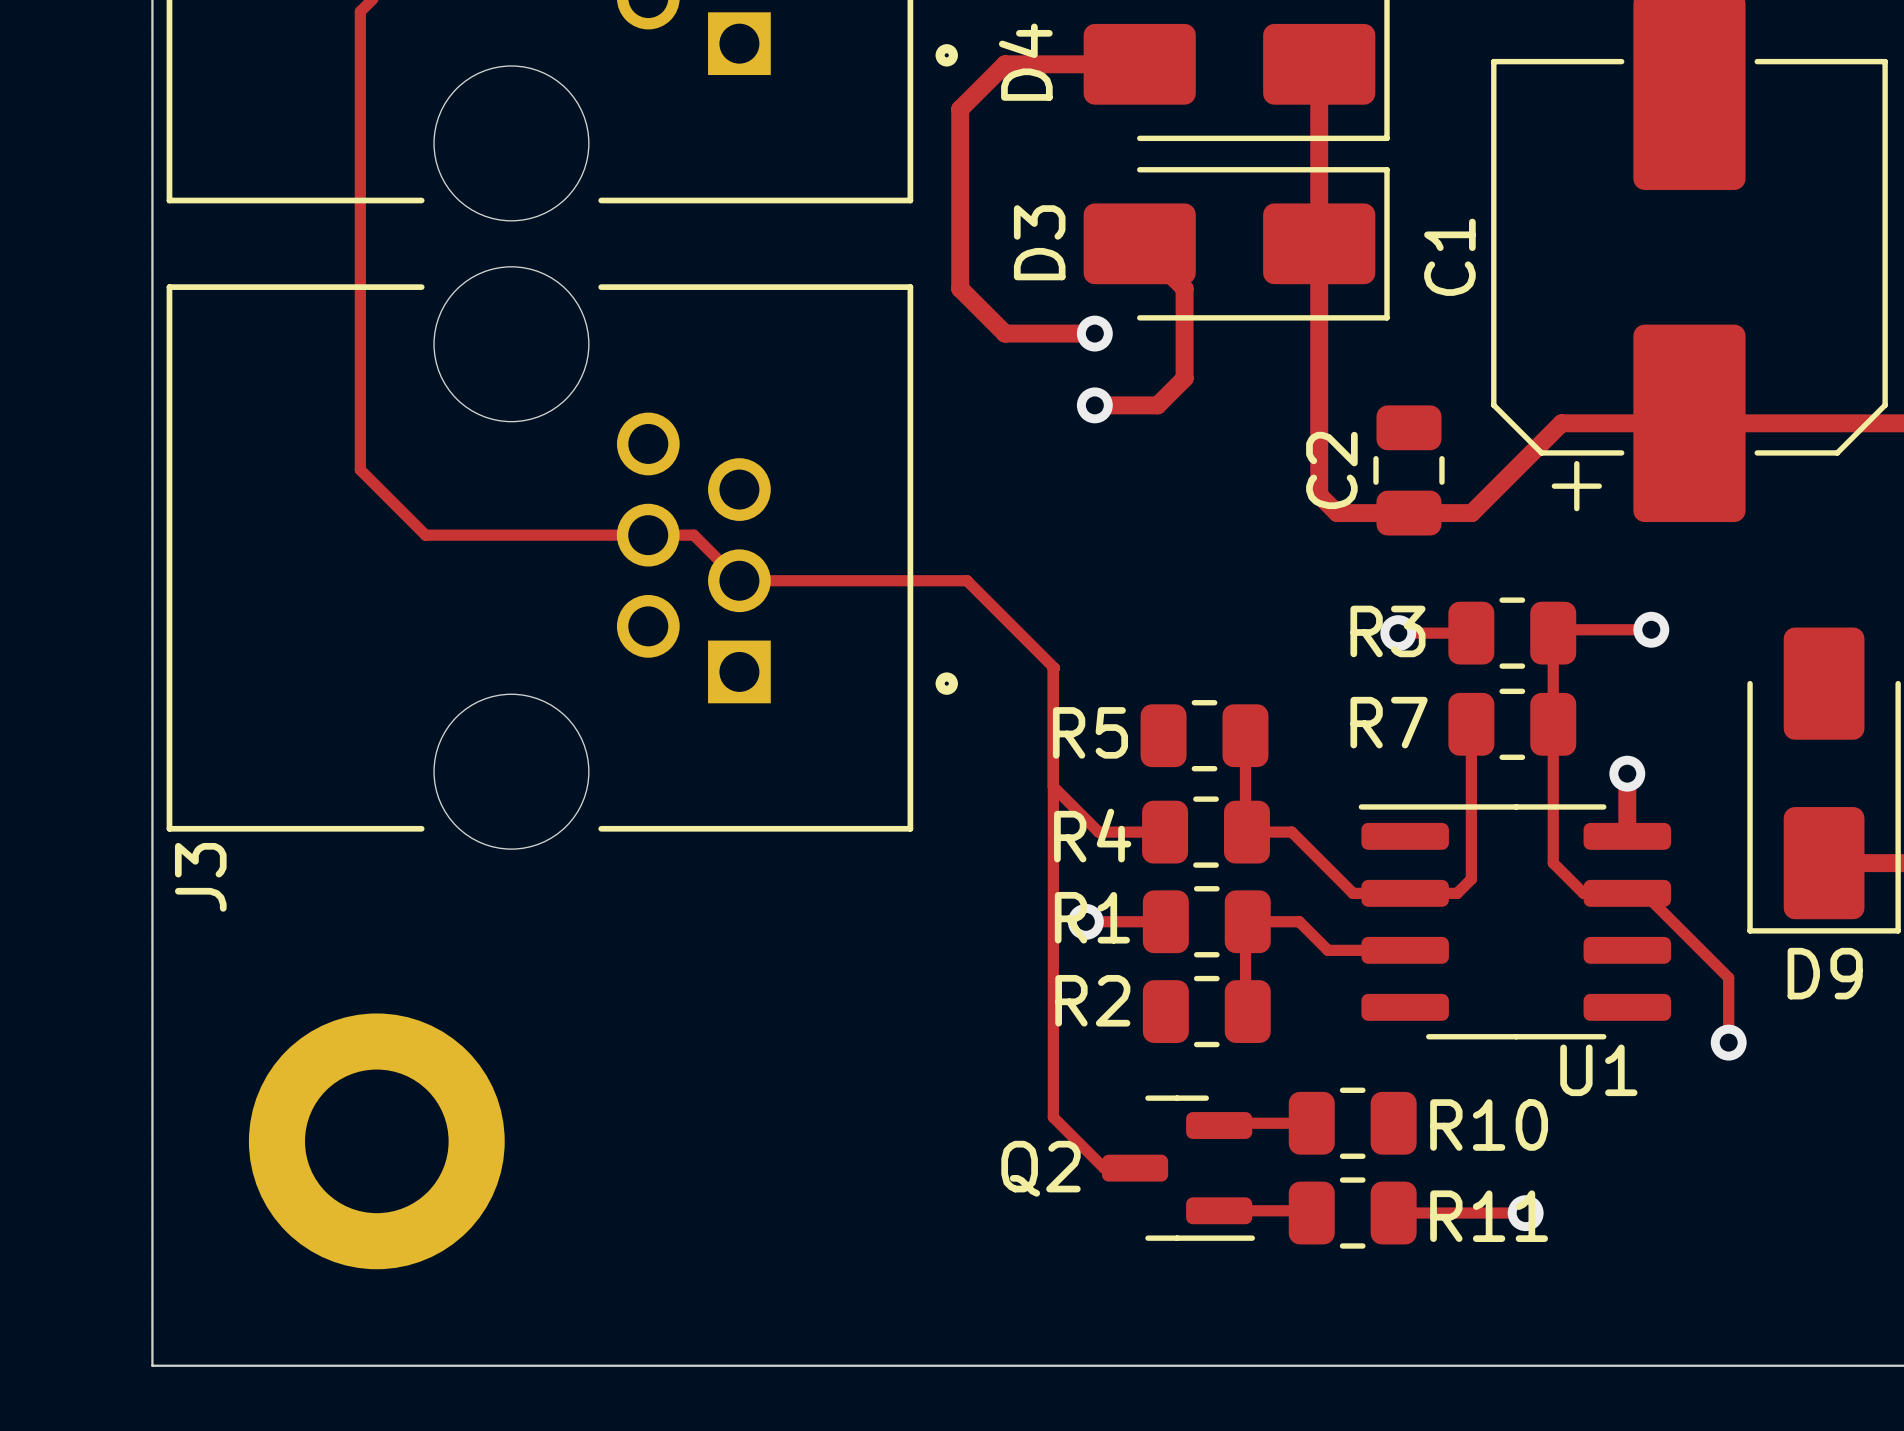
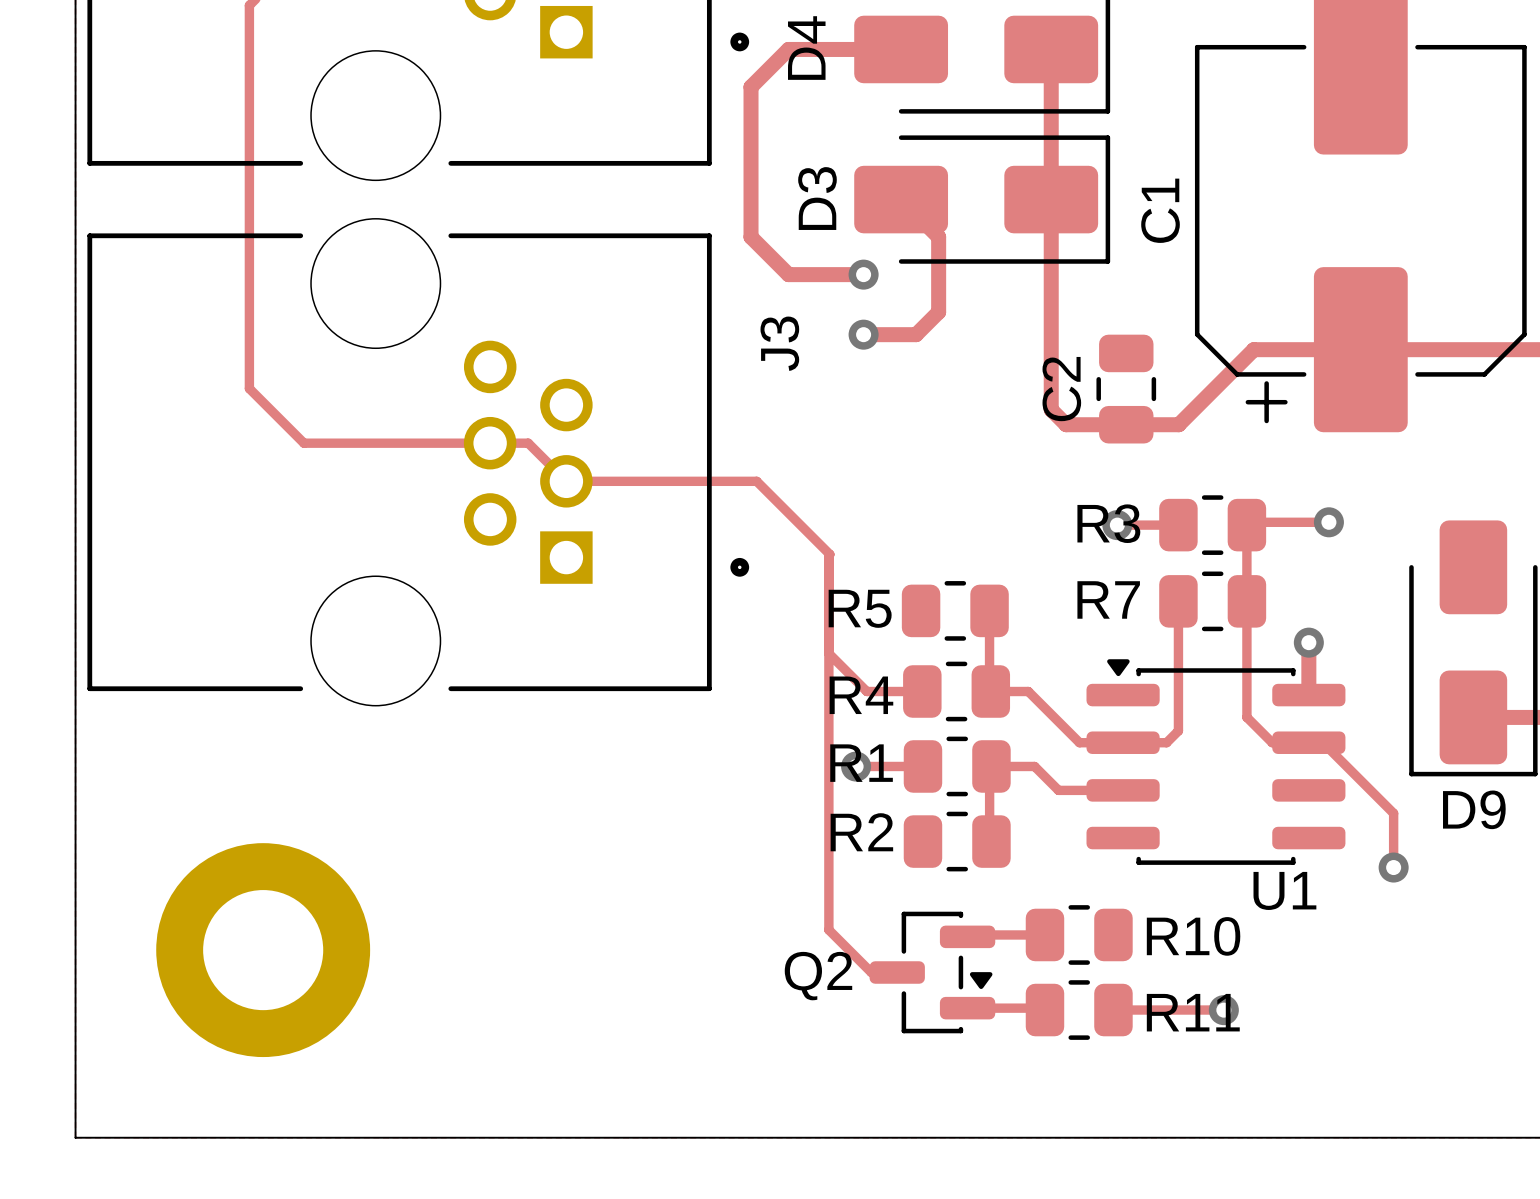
U1 footprint: [1358, 804, 1672, 1040] -> [1086, 659, 1346, 865]
J3 name position: J3 (200, 877) -> J3 (779, 343)
Q2 footprint: [1101, 1095, 1255, 1241] -> [869, 911, 996, 1034]

